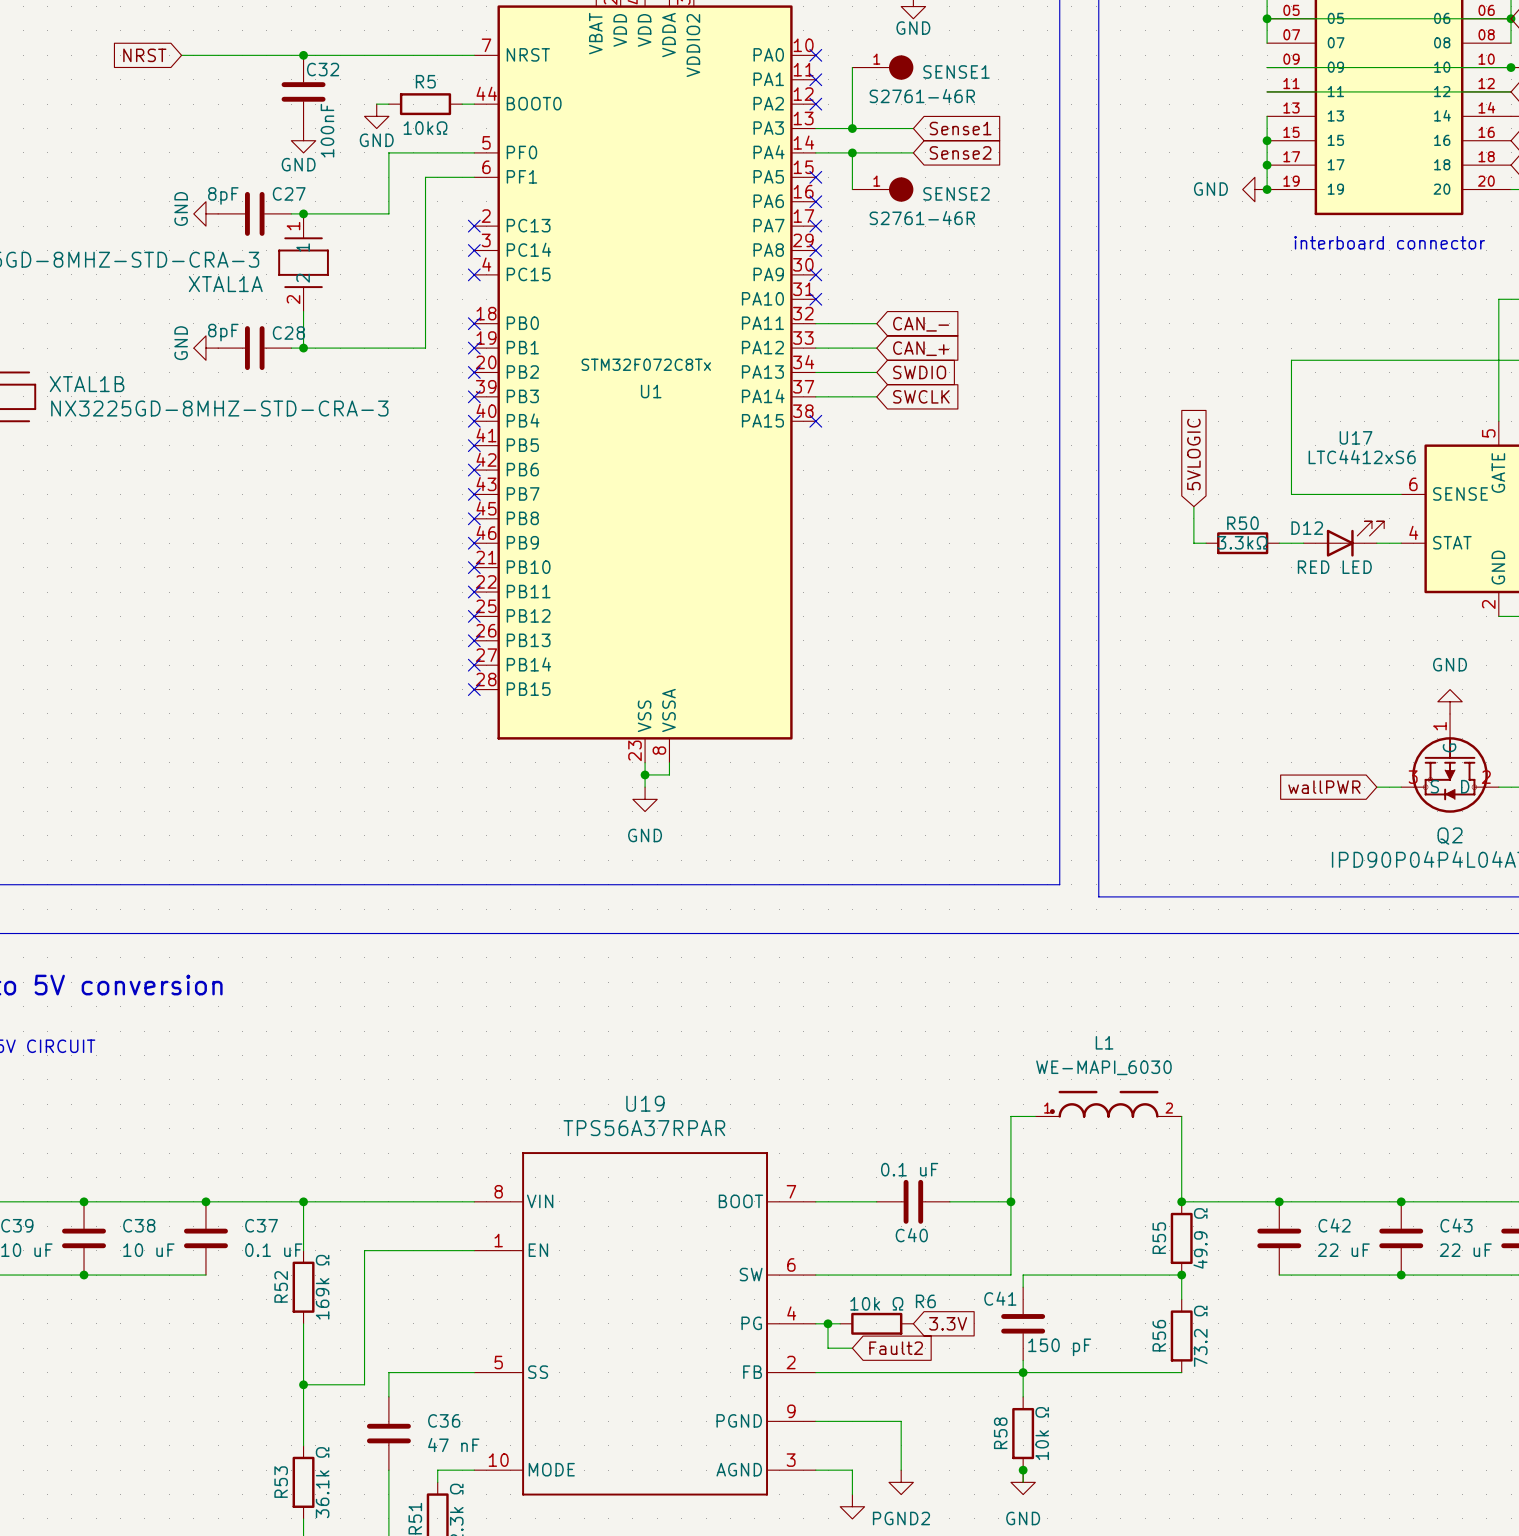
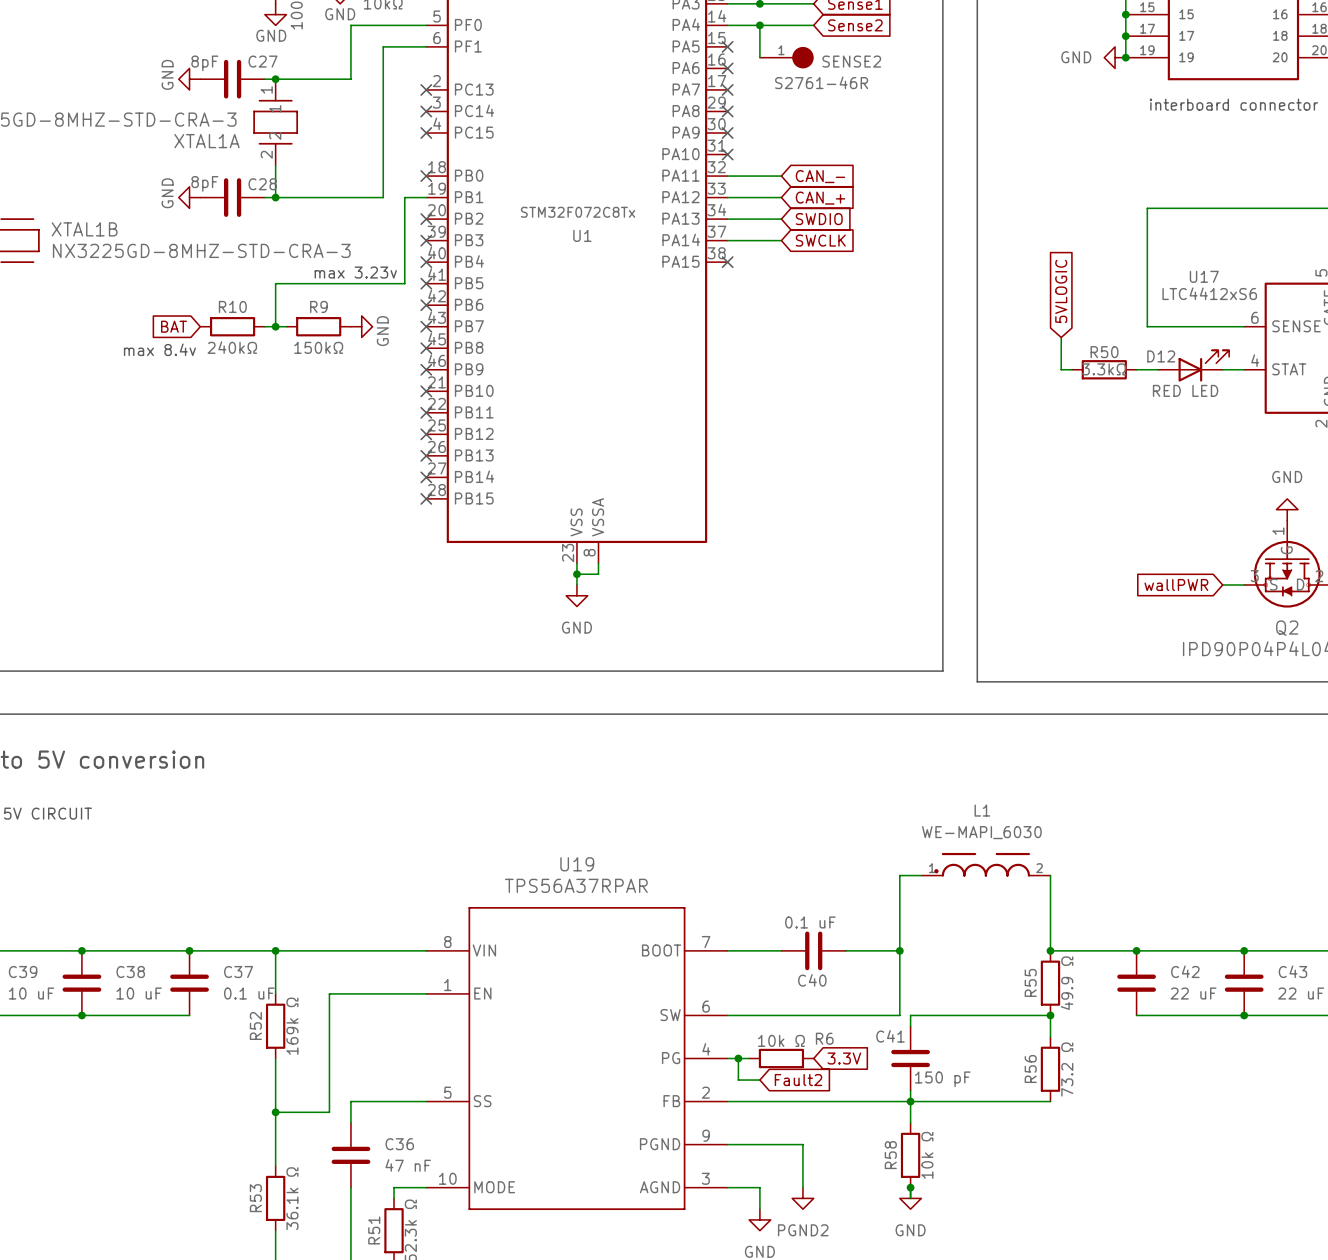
wire: none -> (426, 197) (404, 197) (404, 283) (275, 283) (275, 326)
no-connect mark: (474, 348) -> none
text: none -> max 3.23v (355, 272)
global label: none -> BAT (174, 326)
R10: none -> 240kΩ (232, 326)
wire: none -> (264, 326) (286, 326)
junction: none -> (275, 326)
R9: none -> 150kΩ (318, 326)
power symbol: none -> GND (361, 326)
text: none -> max 8.4v (159, 349)

